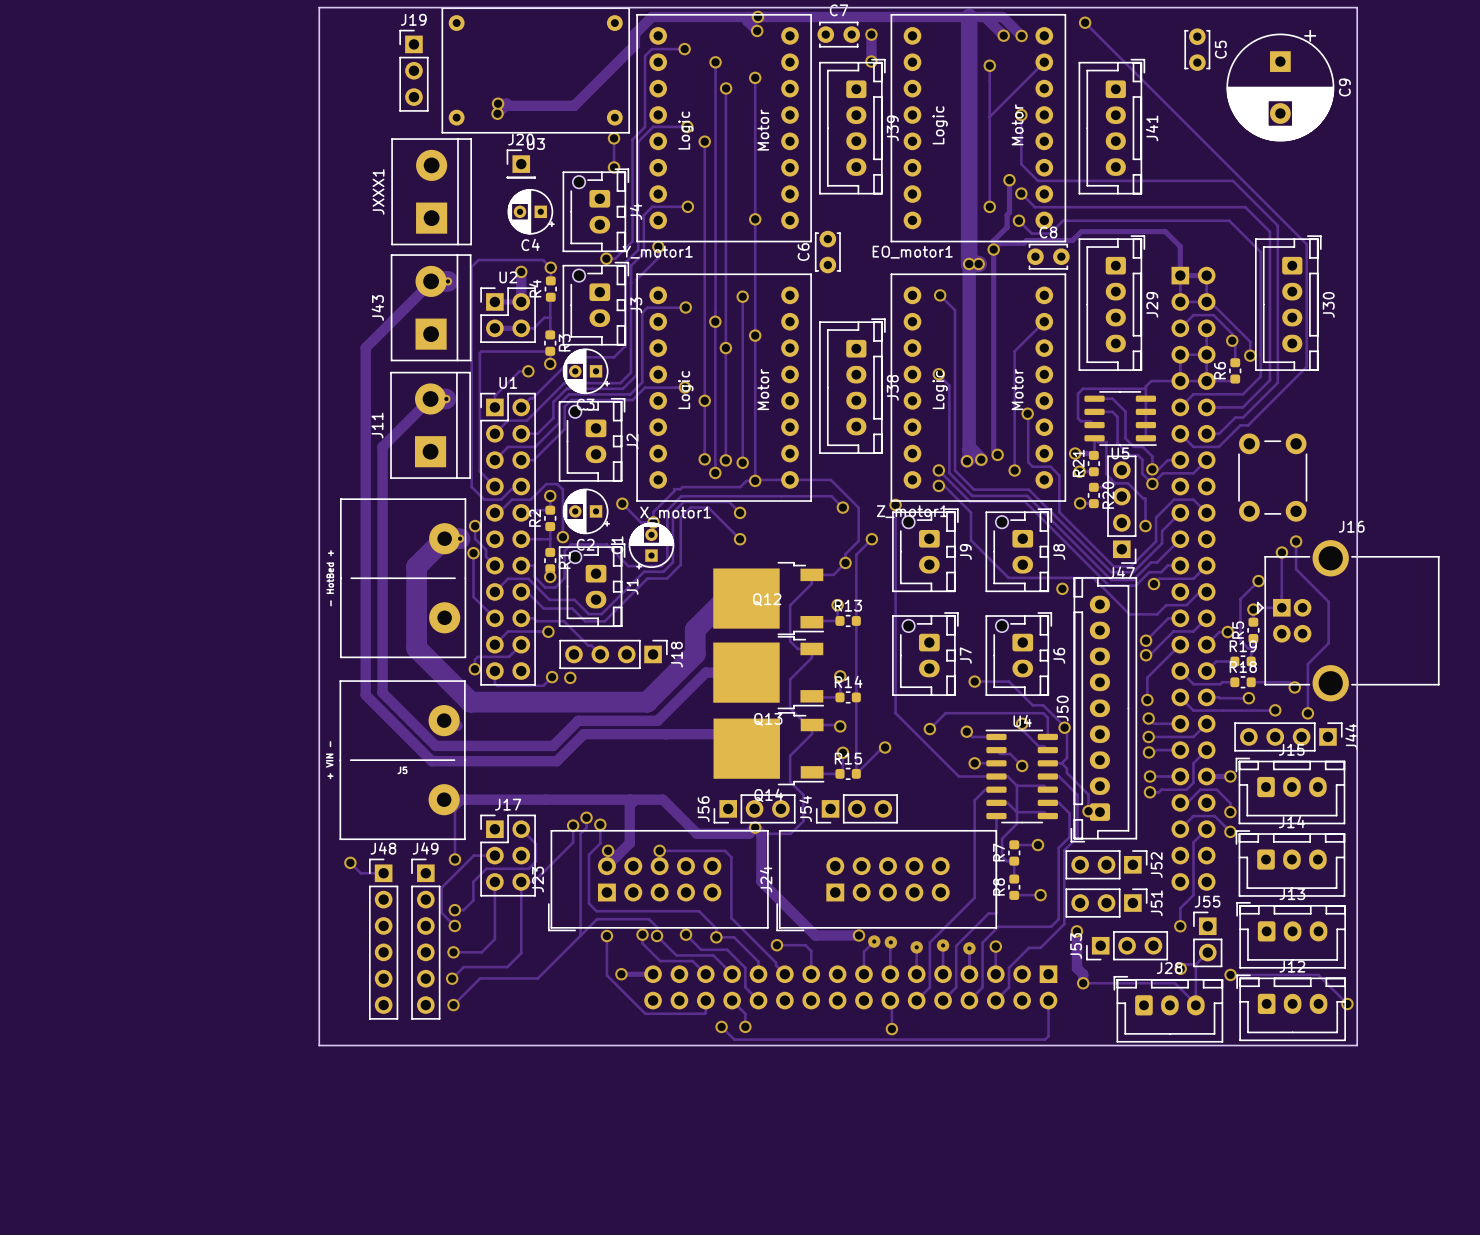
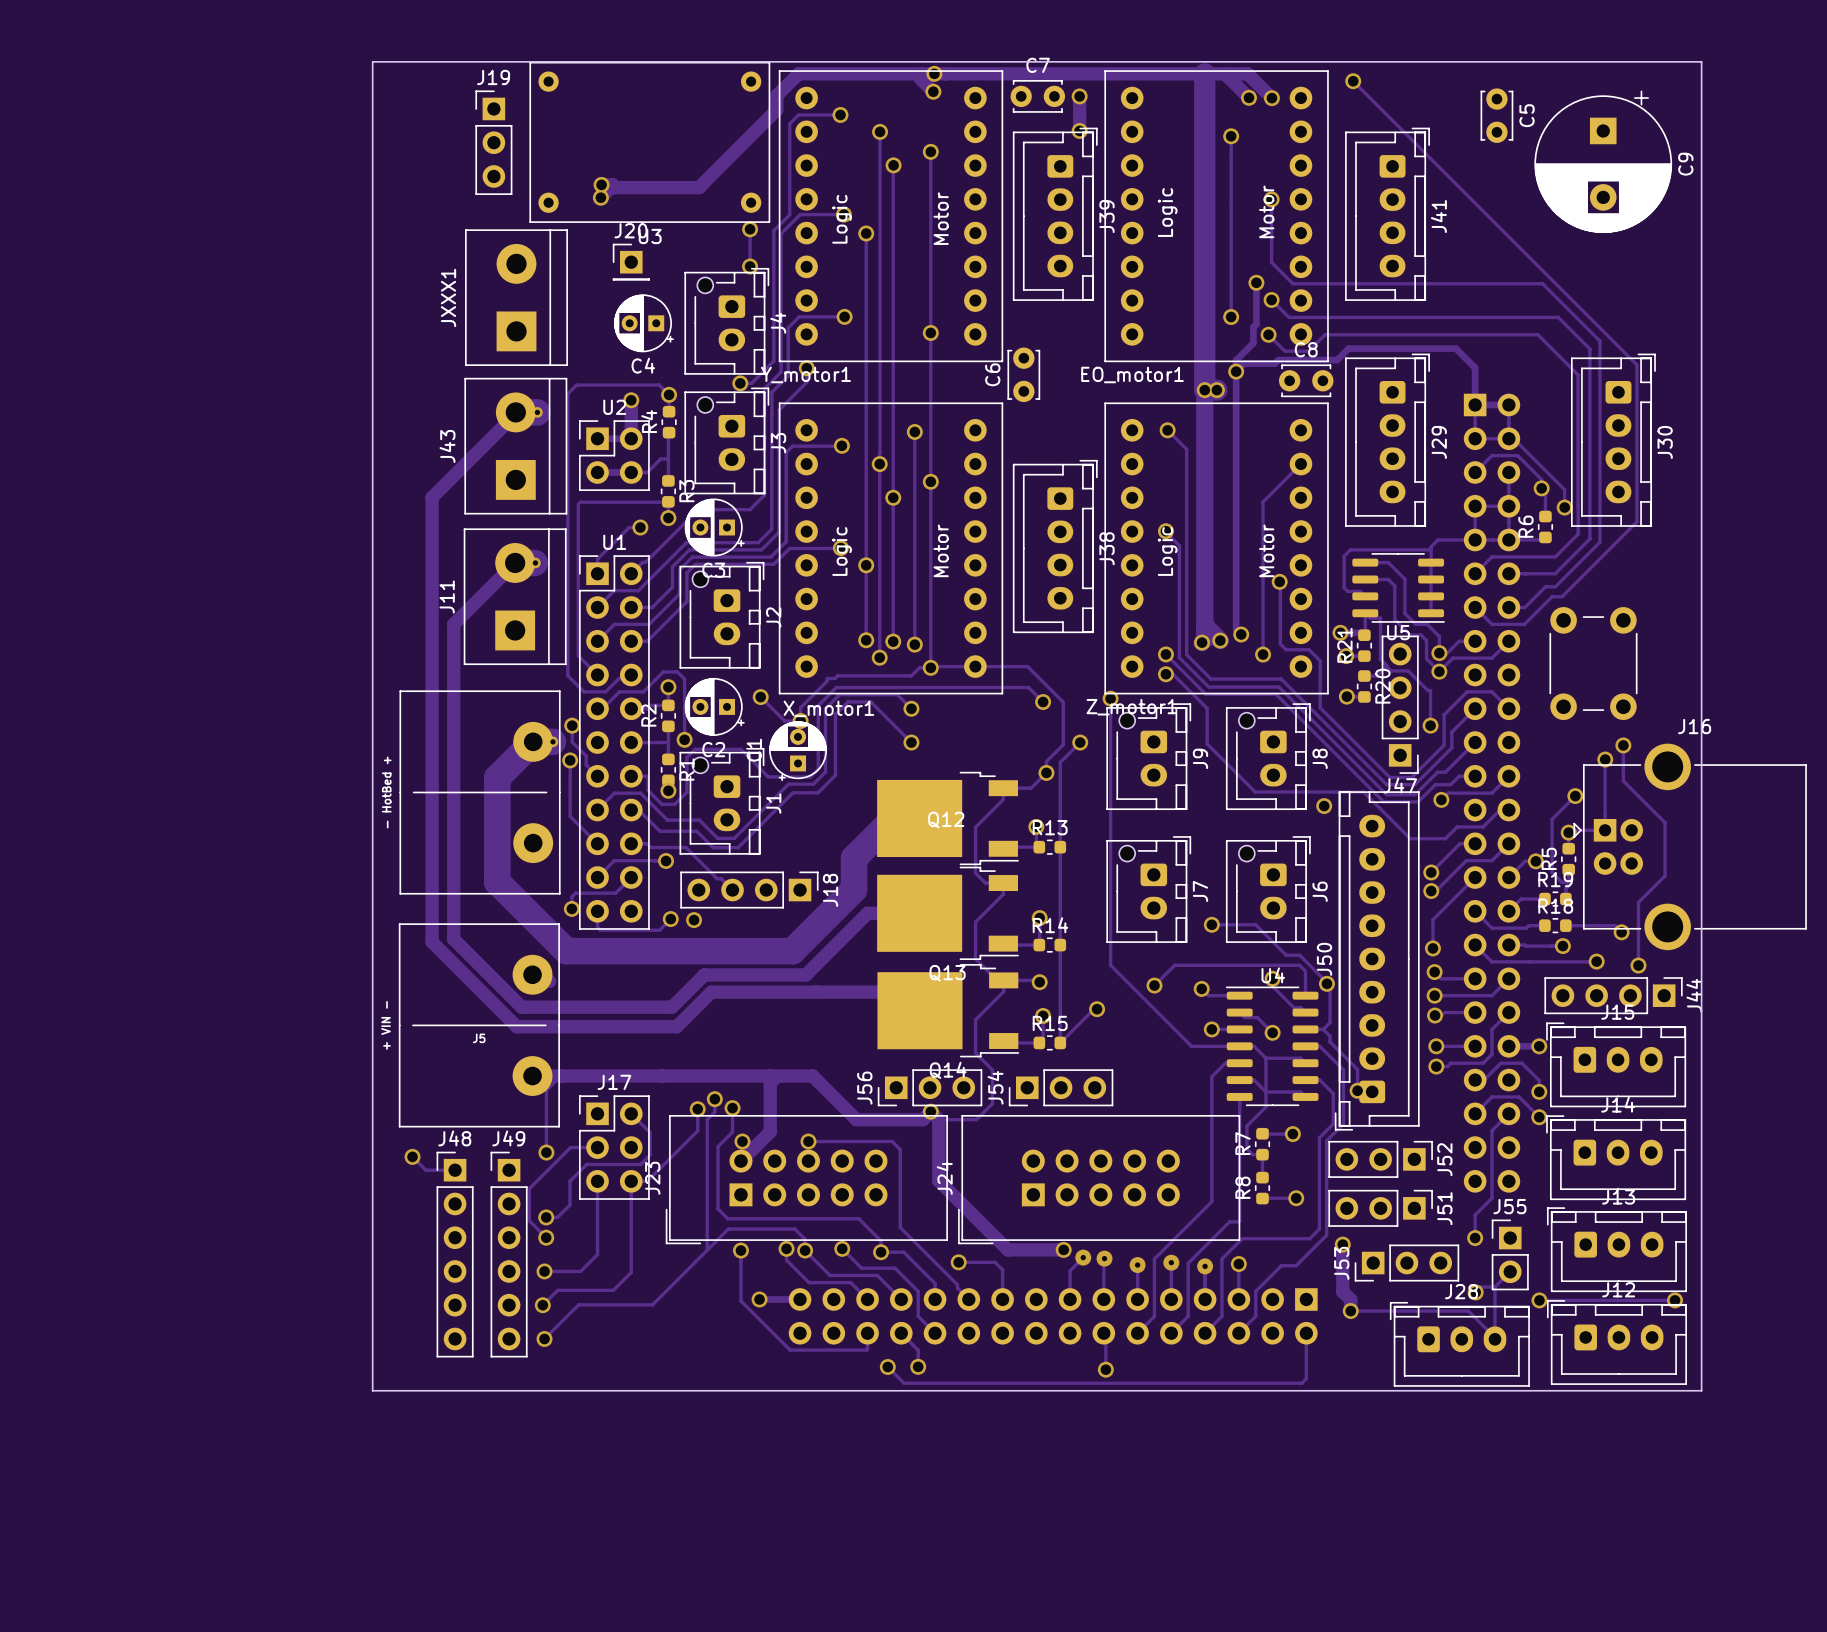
track: (1044, 62) (989, 116) -> none
track: (1318, 974) (1347, 1004) -> (1651, 1300) (1675, 1300)
via position: (1347, 1004) -> (1675, 1300)

